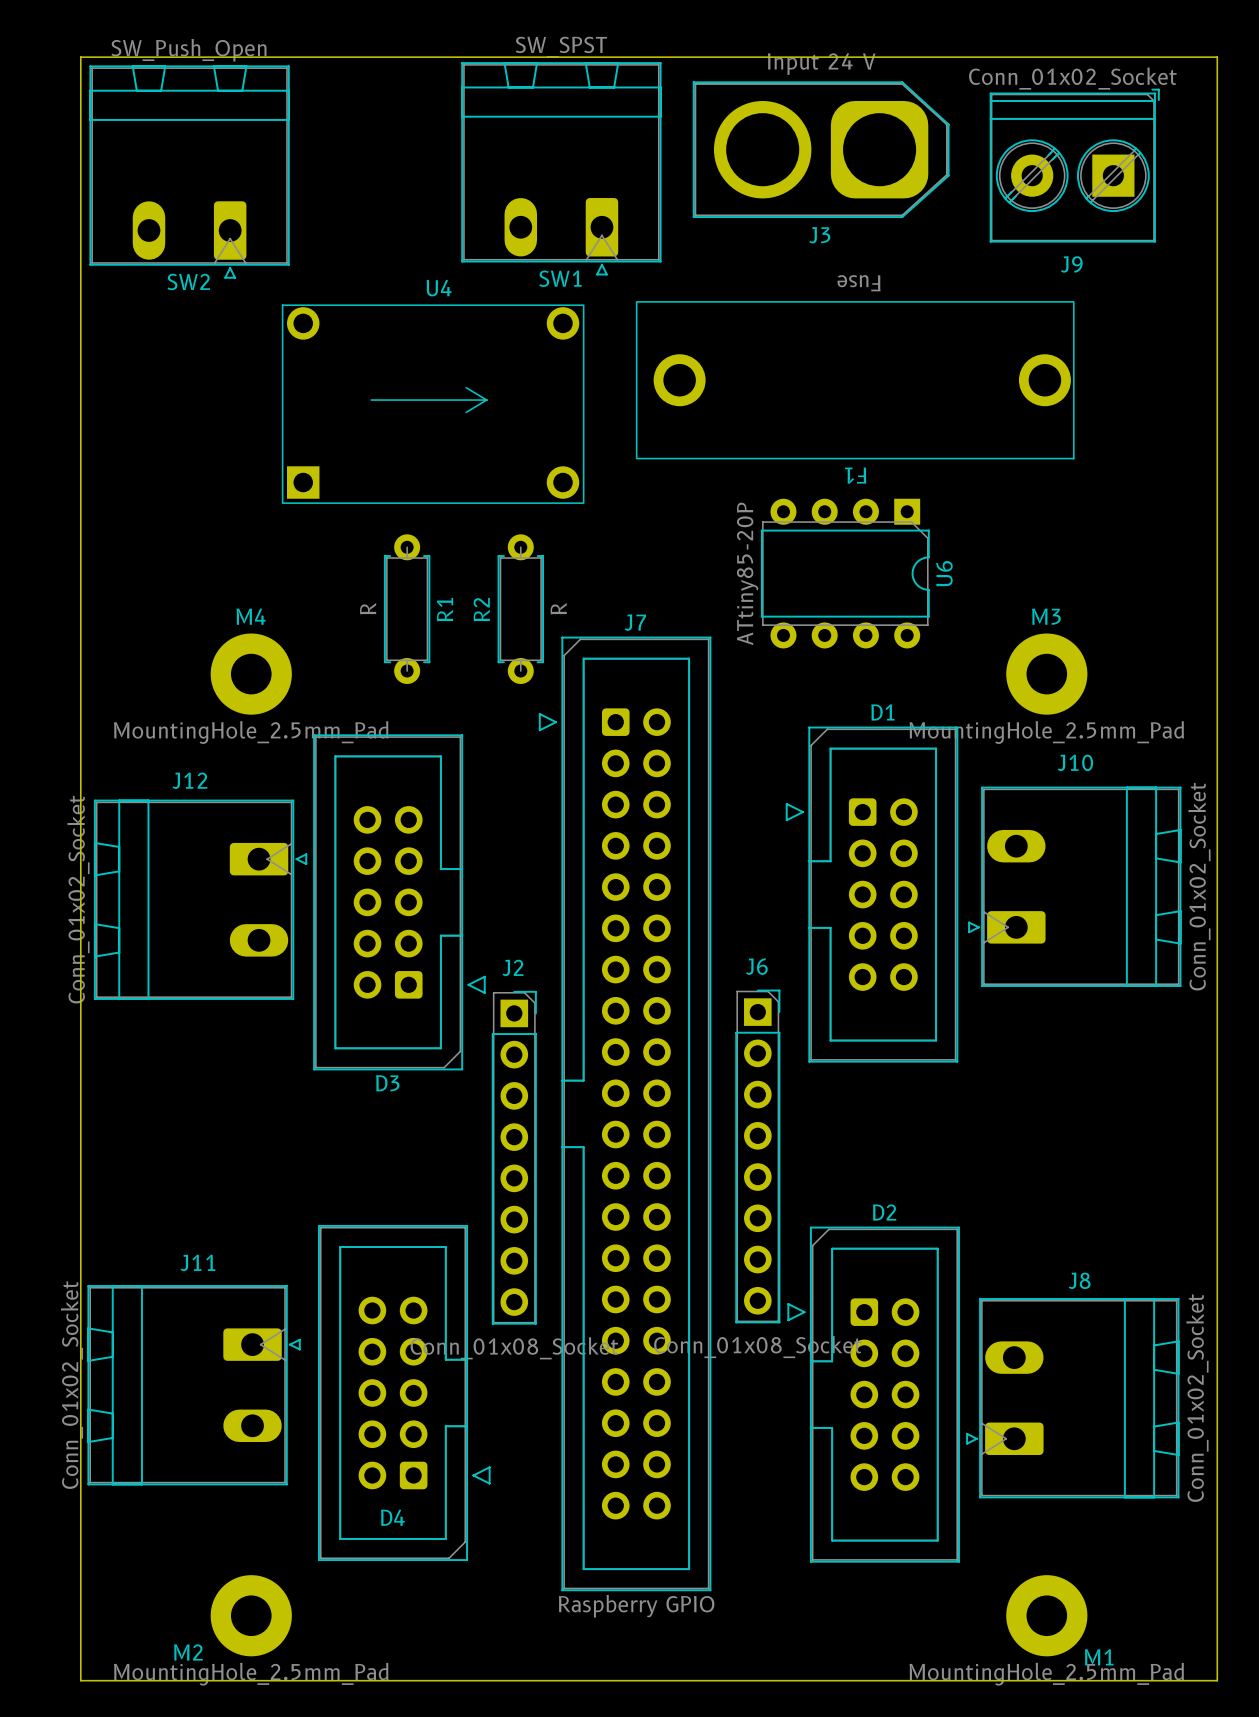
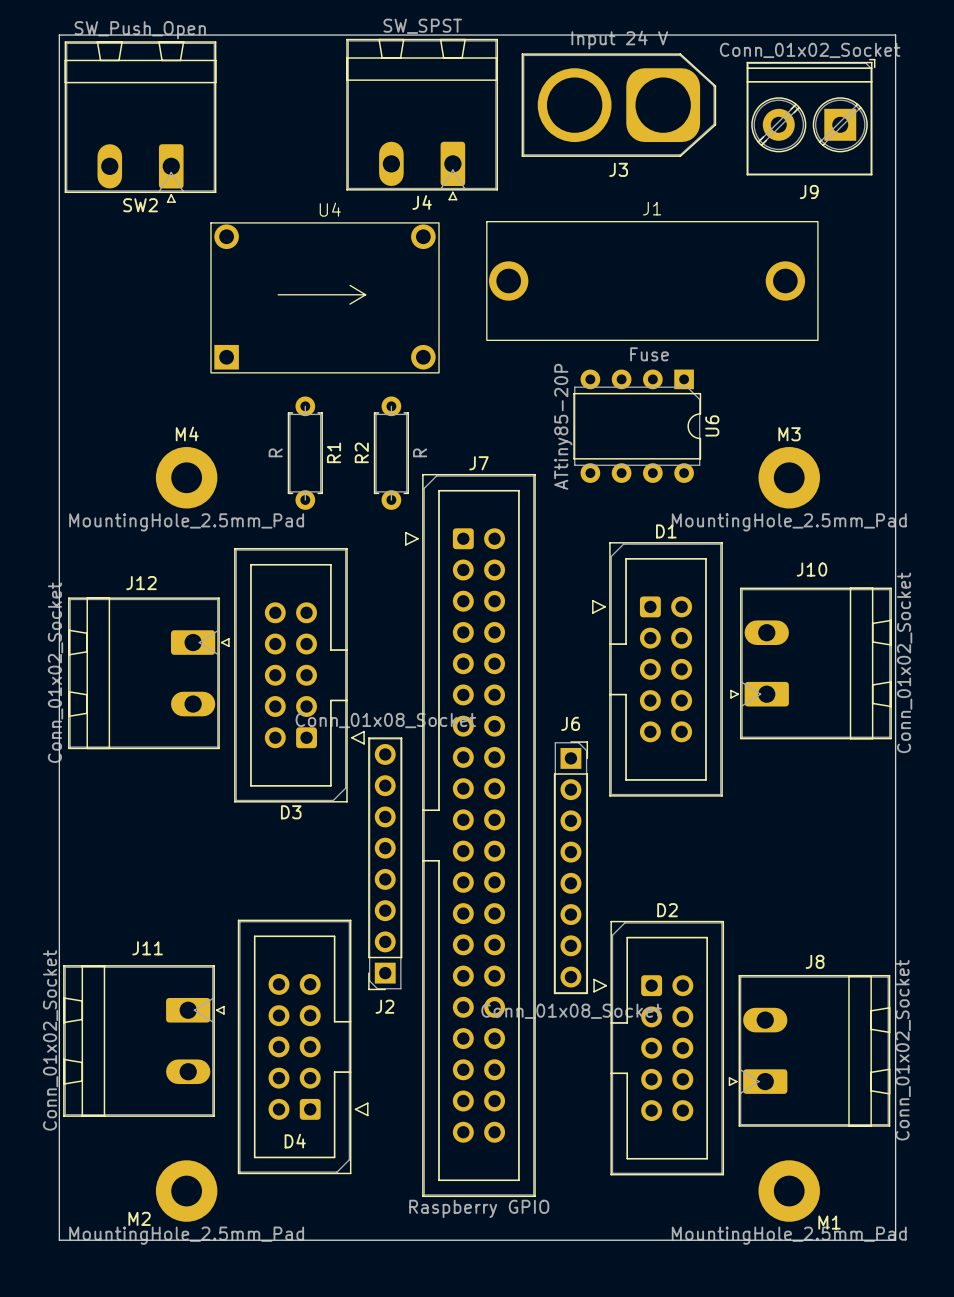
board edge: (82, 57) (80, 57) (80, 1680) (1217, 1680) (1217, 57) (1186, 57) -> (59, 35) (59, 1240) (895, 1240) (895, 35)
SW1 name: SW1 (560, 278) -> J4 (422, 202)
F1: Fuse (855, 380) -> none
J1: none -> Fuse (652, 280)
M4 position: (251, 674) -> (186, 477)
M3 position: (1046, 674) -> (789, 477)
J2 rotation: 0° (514, 1157) -> 180° (385, 863)
M2 position: (251, 1615) -> (186, 1191)
M1 position: (1046, 1615) -> (789, 1191)

